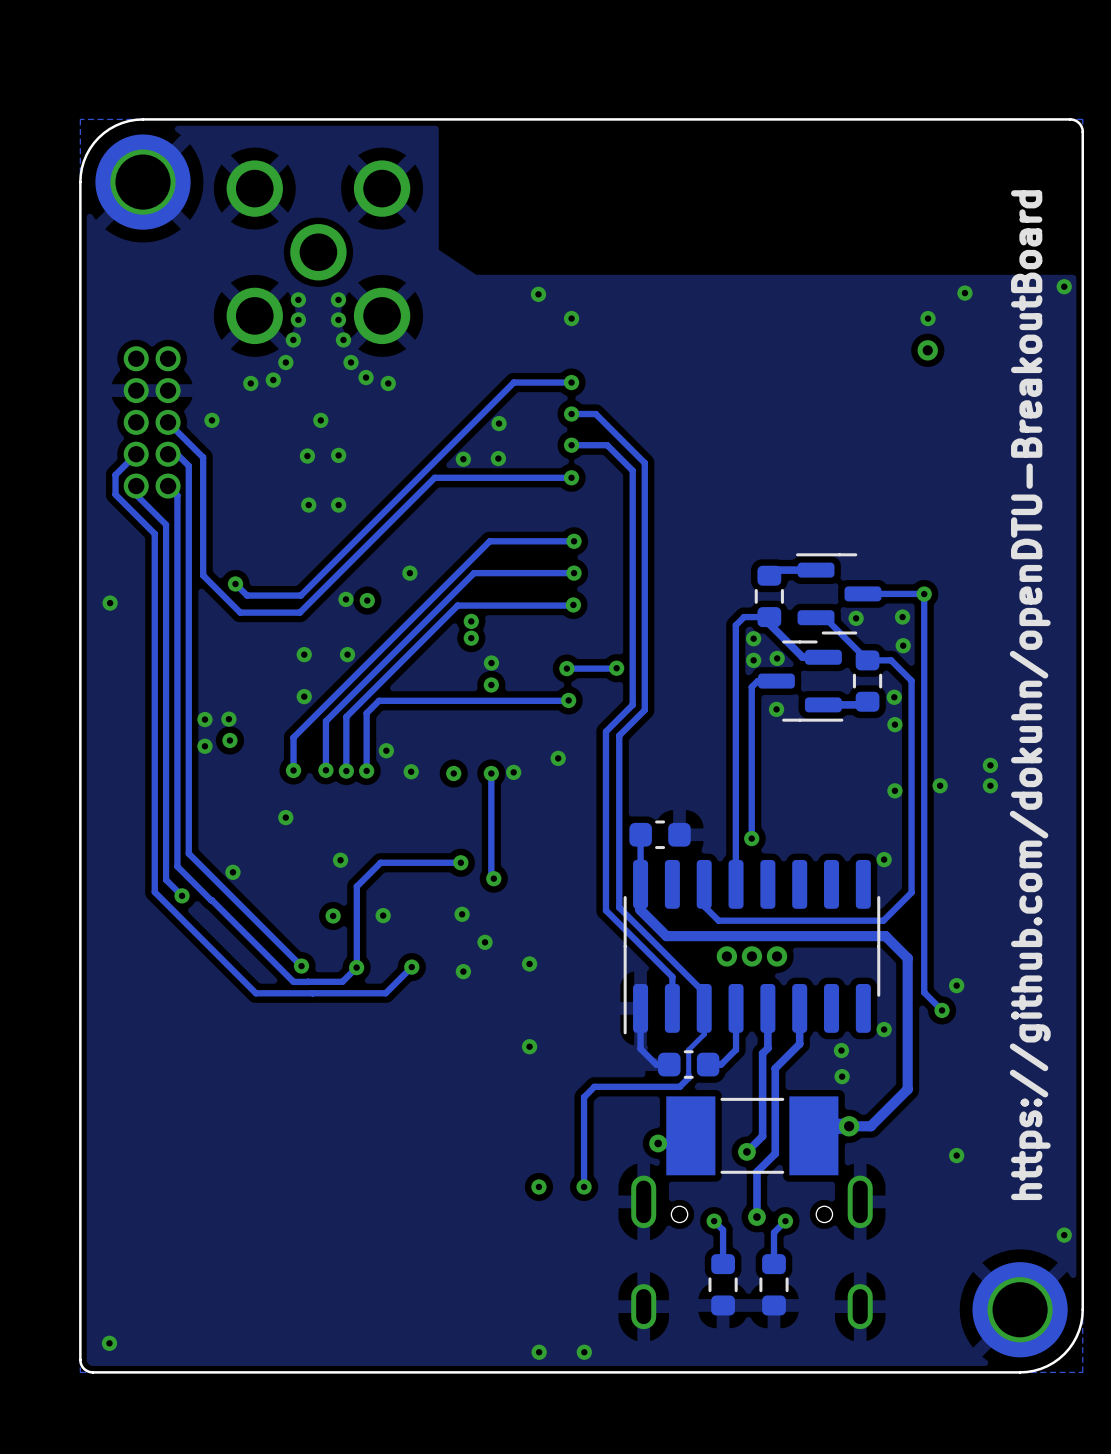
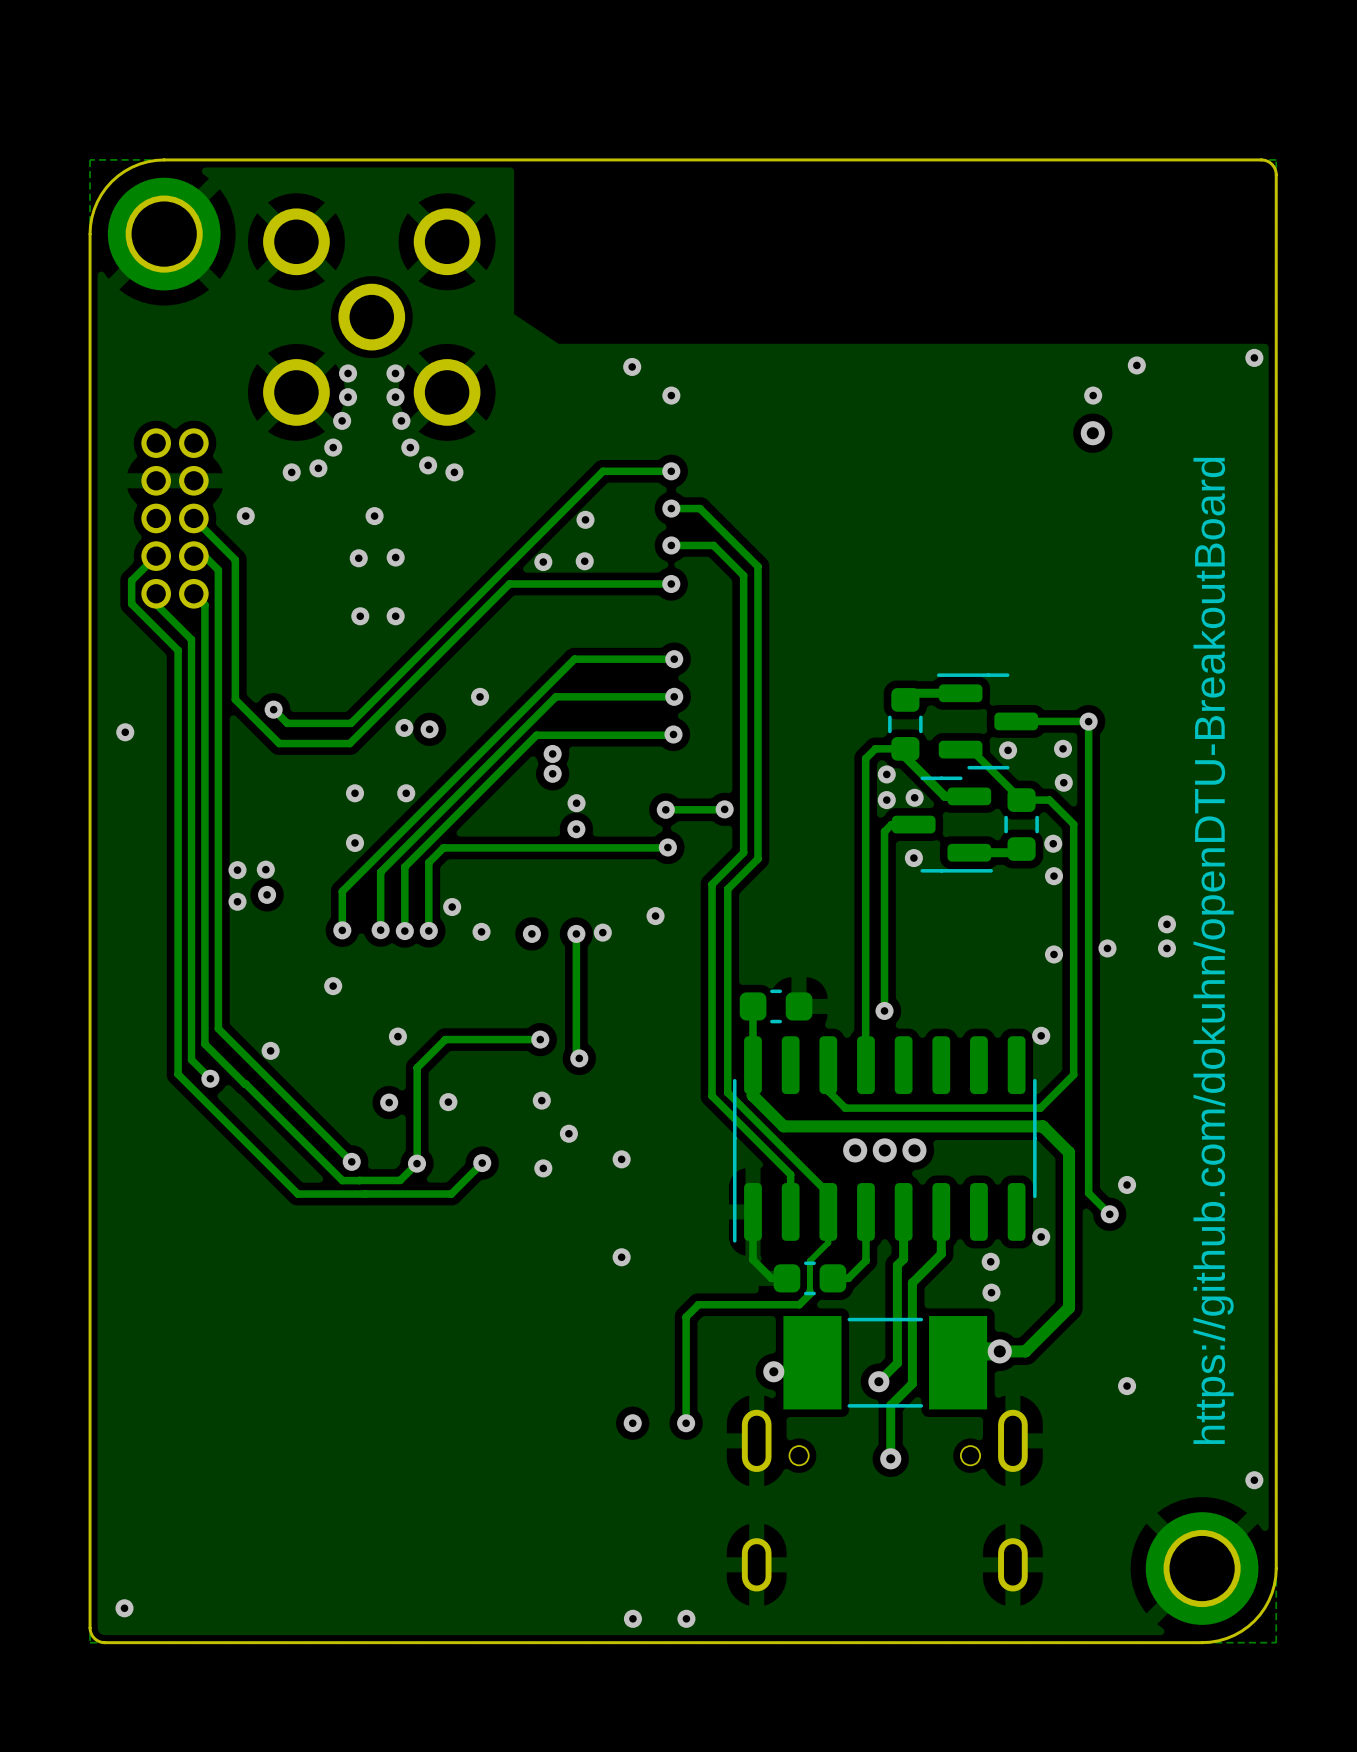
track: (714, 1221) (723, 1230) (723, 1264) -> none
via: (714, 1221) -> none
track: (785, 1221) (774, 1232) (774, 1264) -> none
via: (785, 1221) -> none
part: (723, 1284) -> none
part: (774, 1284) -> none

